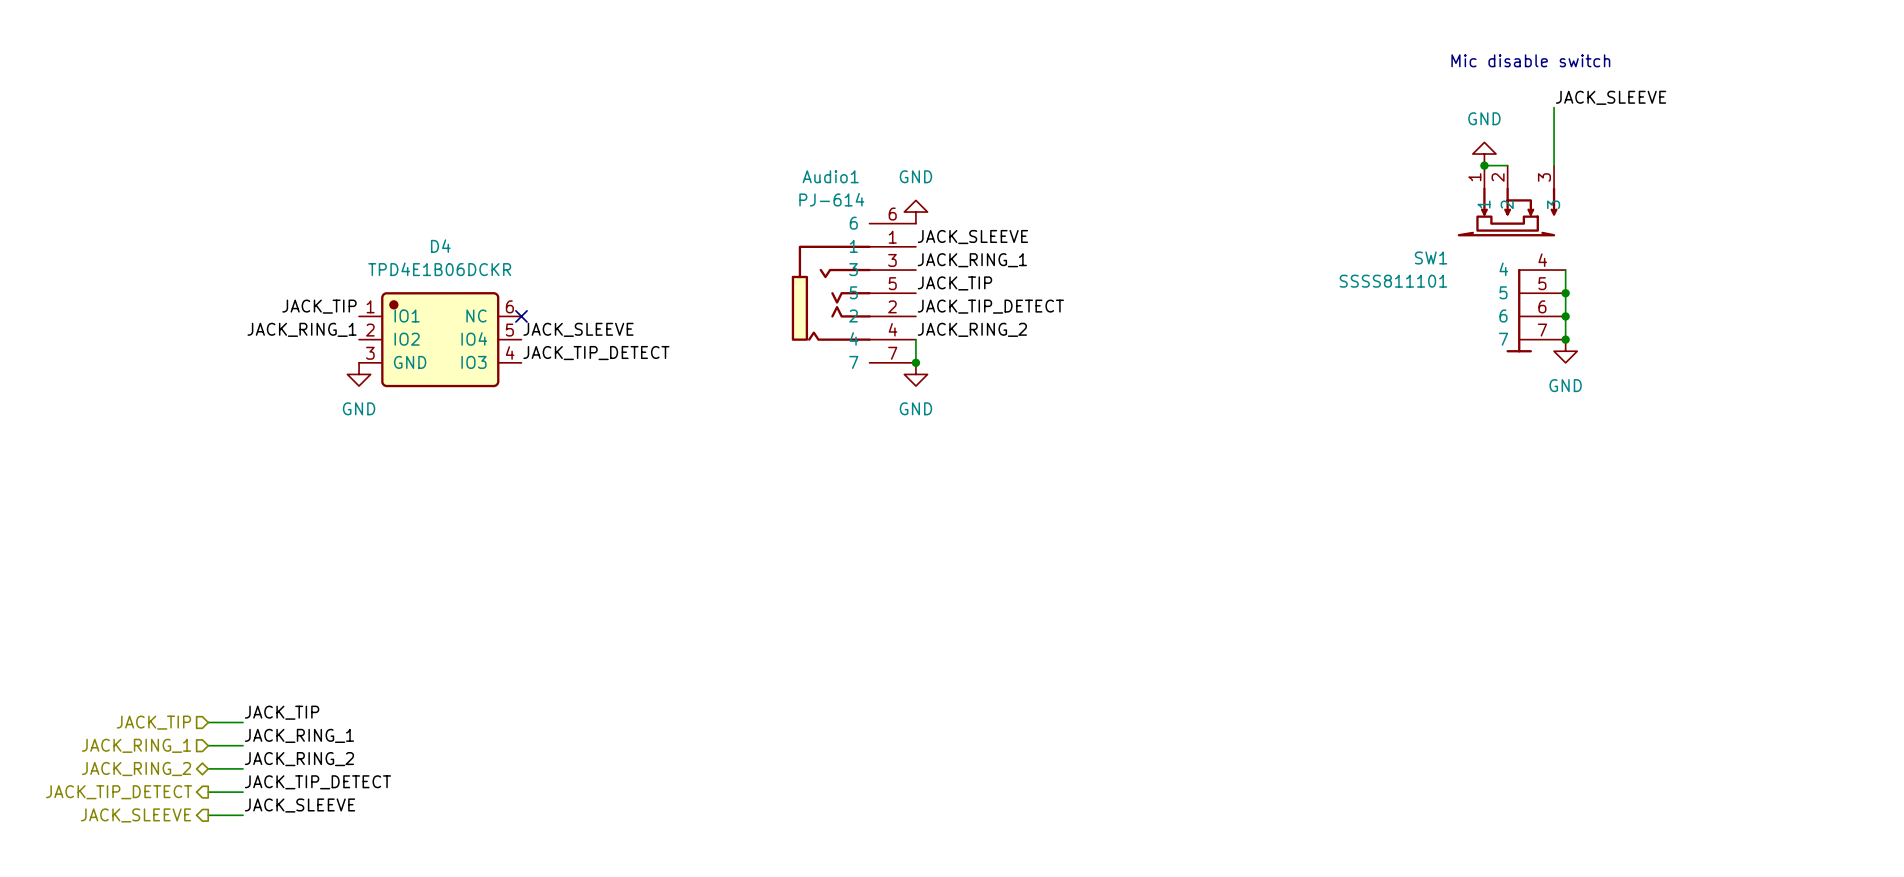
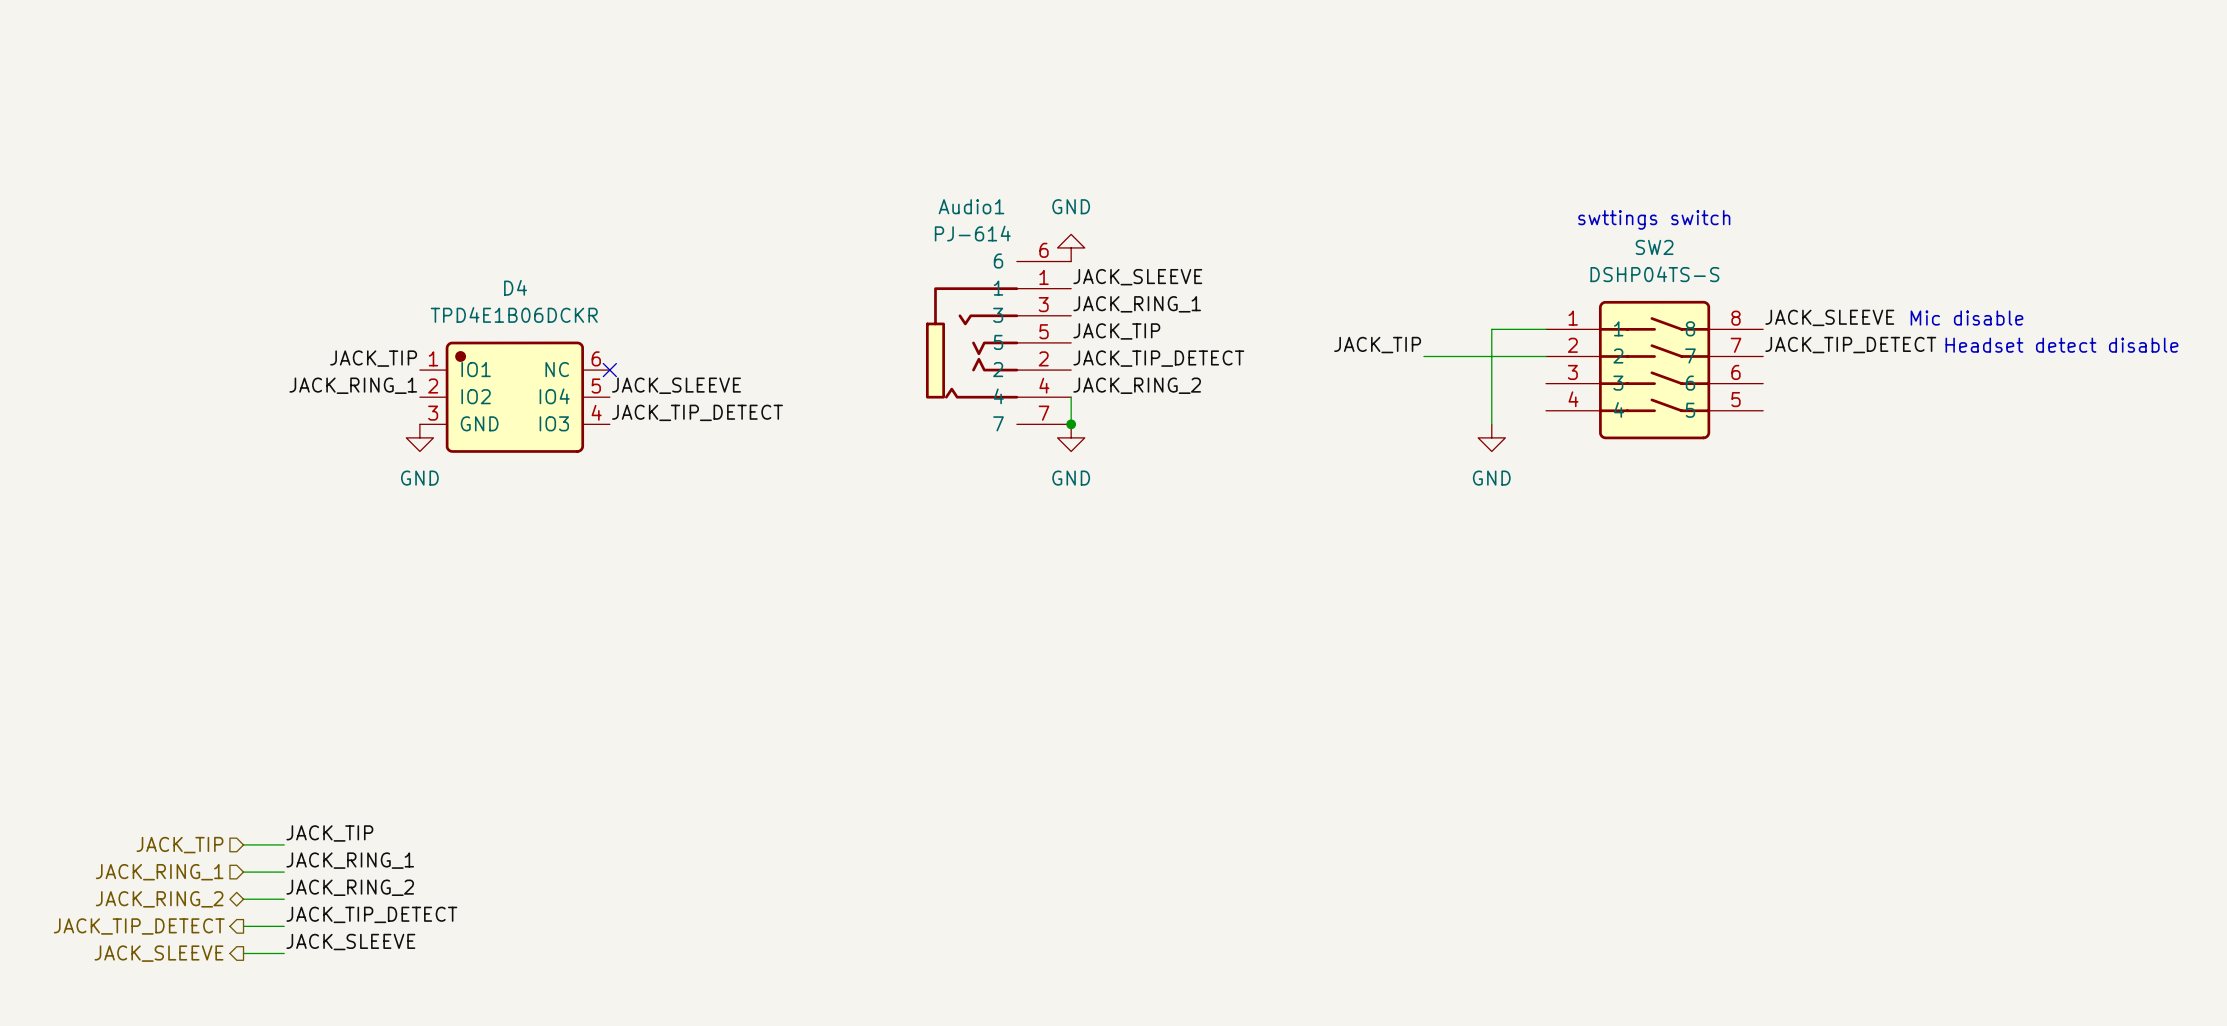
text: Mic disable switch (1530, 60) -> none
label position: JACK_SLEEVE (1611, 97) -> JACK_SLEEVE (1829, 317)
wire: (1554, 107) (1554, 165) -> none
power symbol: GND (1484, 154) -> none
wire: (1484, 165) (1507, 165) -> none
junction: (1484, 165) -> none
text: none -> swttings switch (1654, 219)
SW1: SSSS811101 (1511, 259) -> none
wire: (1565, 270) (1565, 339) -> none
text: none -> Mic disable (1966, 318)
wire: none -> (1546, 329) (1491, 329) (1491, 424)
junction: (1565, 293) -> none
label: none -> JACK_TIP (1377, 345)
label: none -> JACK_TIP_DETECT (1850, 345)
text: none -> Headset detect disable (2061, 345)
wire: none -> (1423, 356) (1546, 356)
SW2: none -> DSHP04TS-S (1654, 370)
junction: (1565, 316) -> none
junction: (1565, 339) -> none
power symbol: GND (1565, 351) -> none
power symbol: none -> GND (1491, 437)

